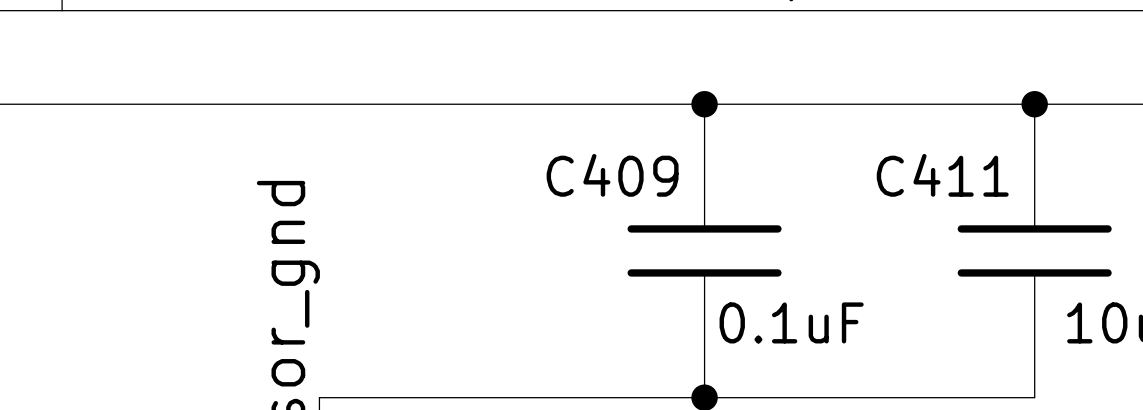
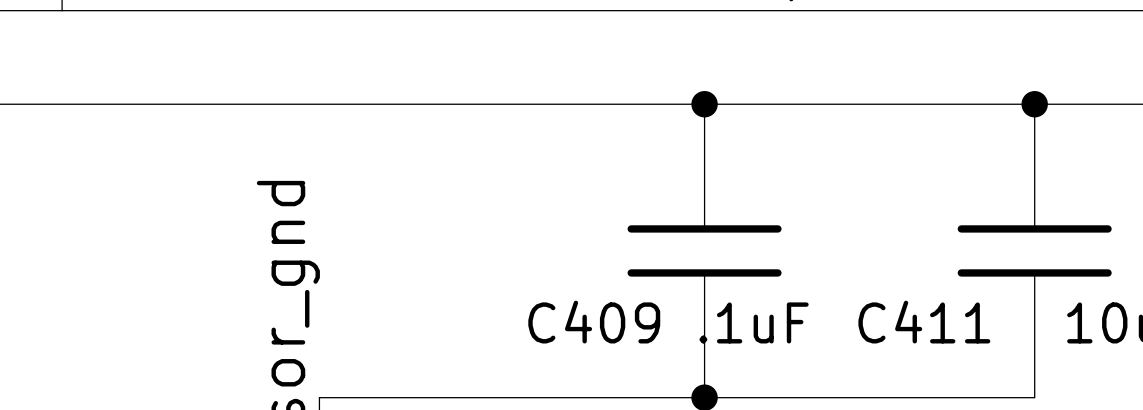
C409 name position: C409 (612, 175) -> C409 (594, 322)
C411 name position: C411 (942, 175) -> C411 (924, 322)
C409 value: 0.1uF (791, 322) -> .1uF (754, 322)

